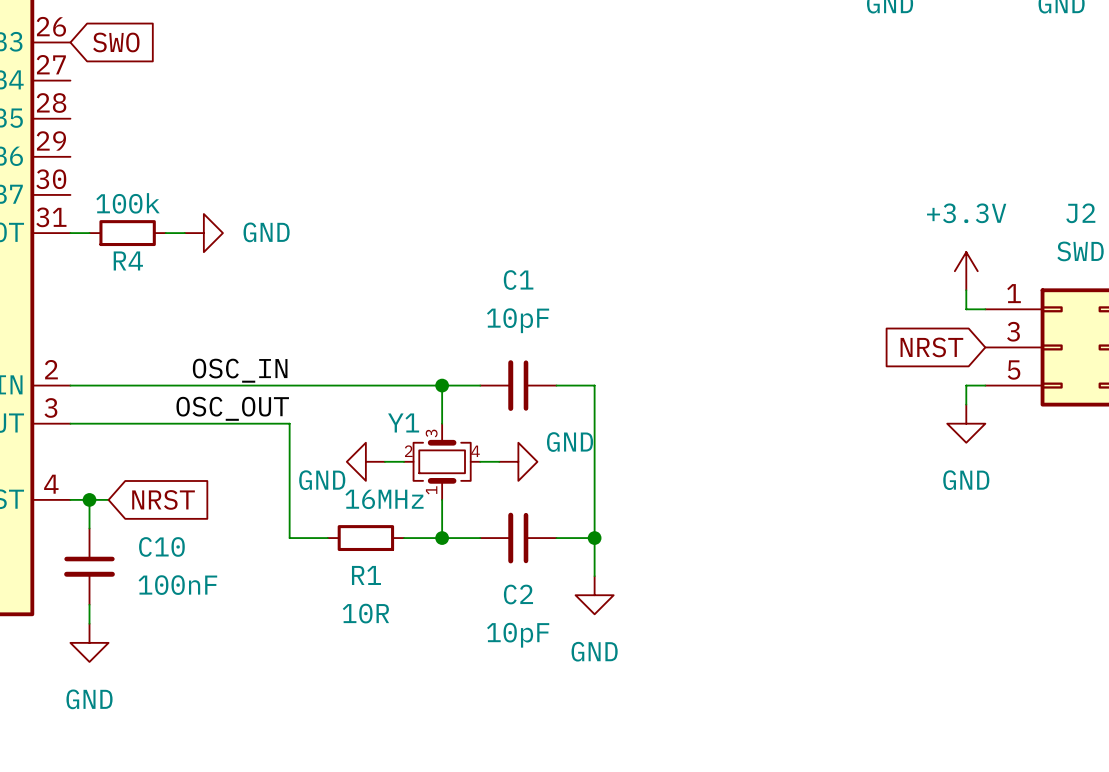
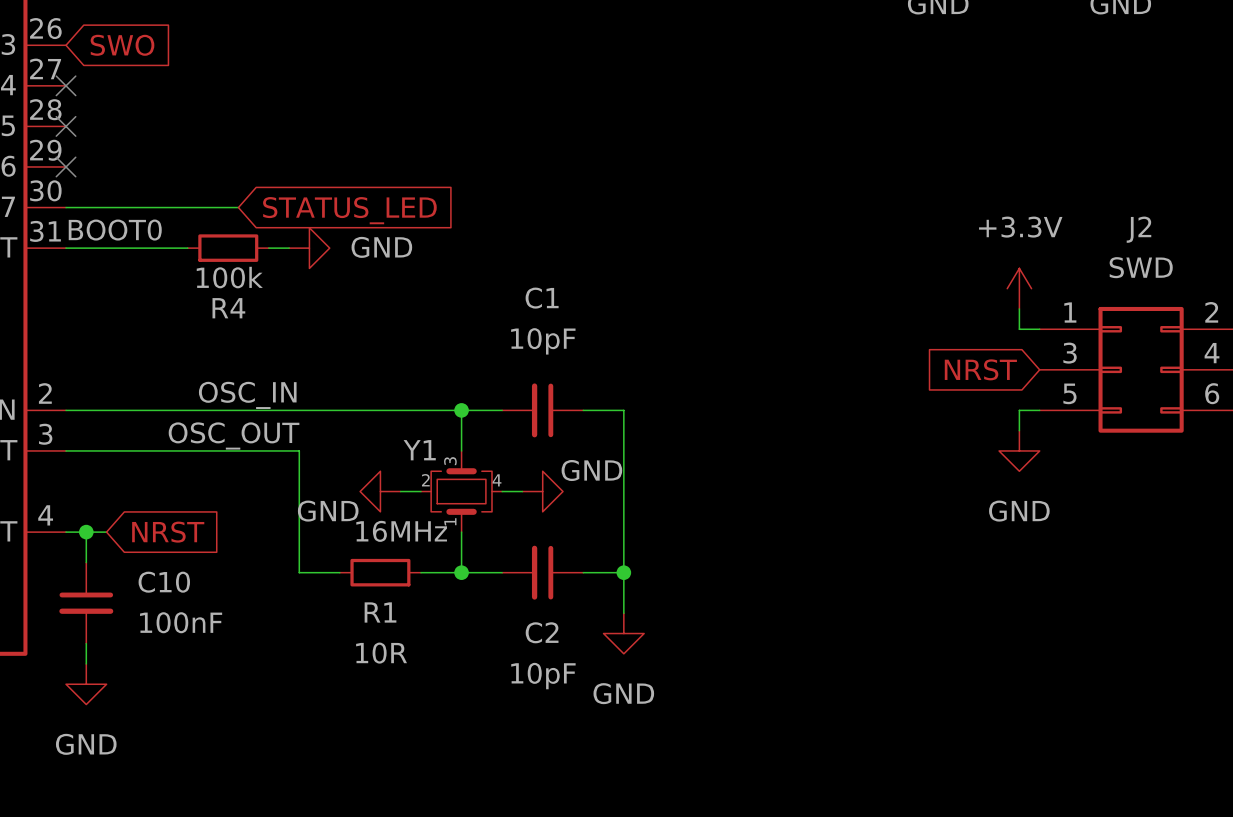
no-connect mark: none -> (66, 85)
no-connect mark: none -> (66, 126)
no-connect mark: none -> (66, 166)
wire: none -> (66, 207) (238, 207)
global label: none -> STATUS_LED (349, 210)
R4 value position: 100k (128, 203) -> 100k (229, 277)
label: none -> BOOT0 (115, 230)
wire: none -> (86, 248) (167, 248)
R4 position: (127, 233) -> (228, 248)
power symbol position: GND (203, 233) -> GND (309, 248)
wire: none -> (268, 248) (289, 248)
R4 name position: R4 (128, 260) -> R4 (228, 308)

